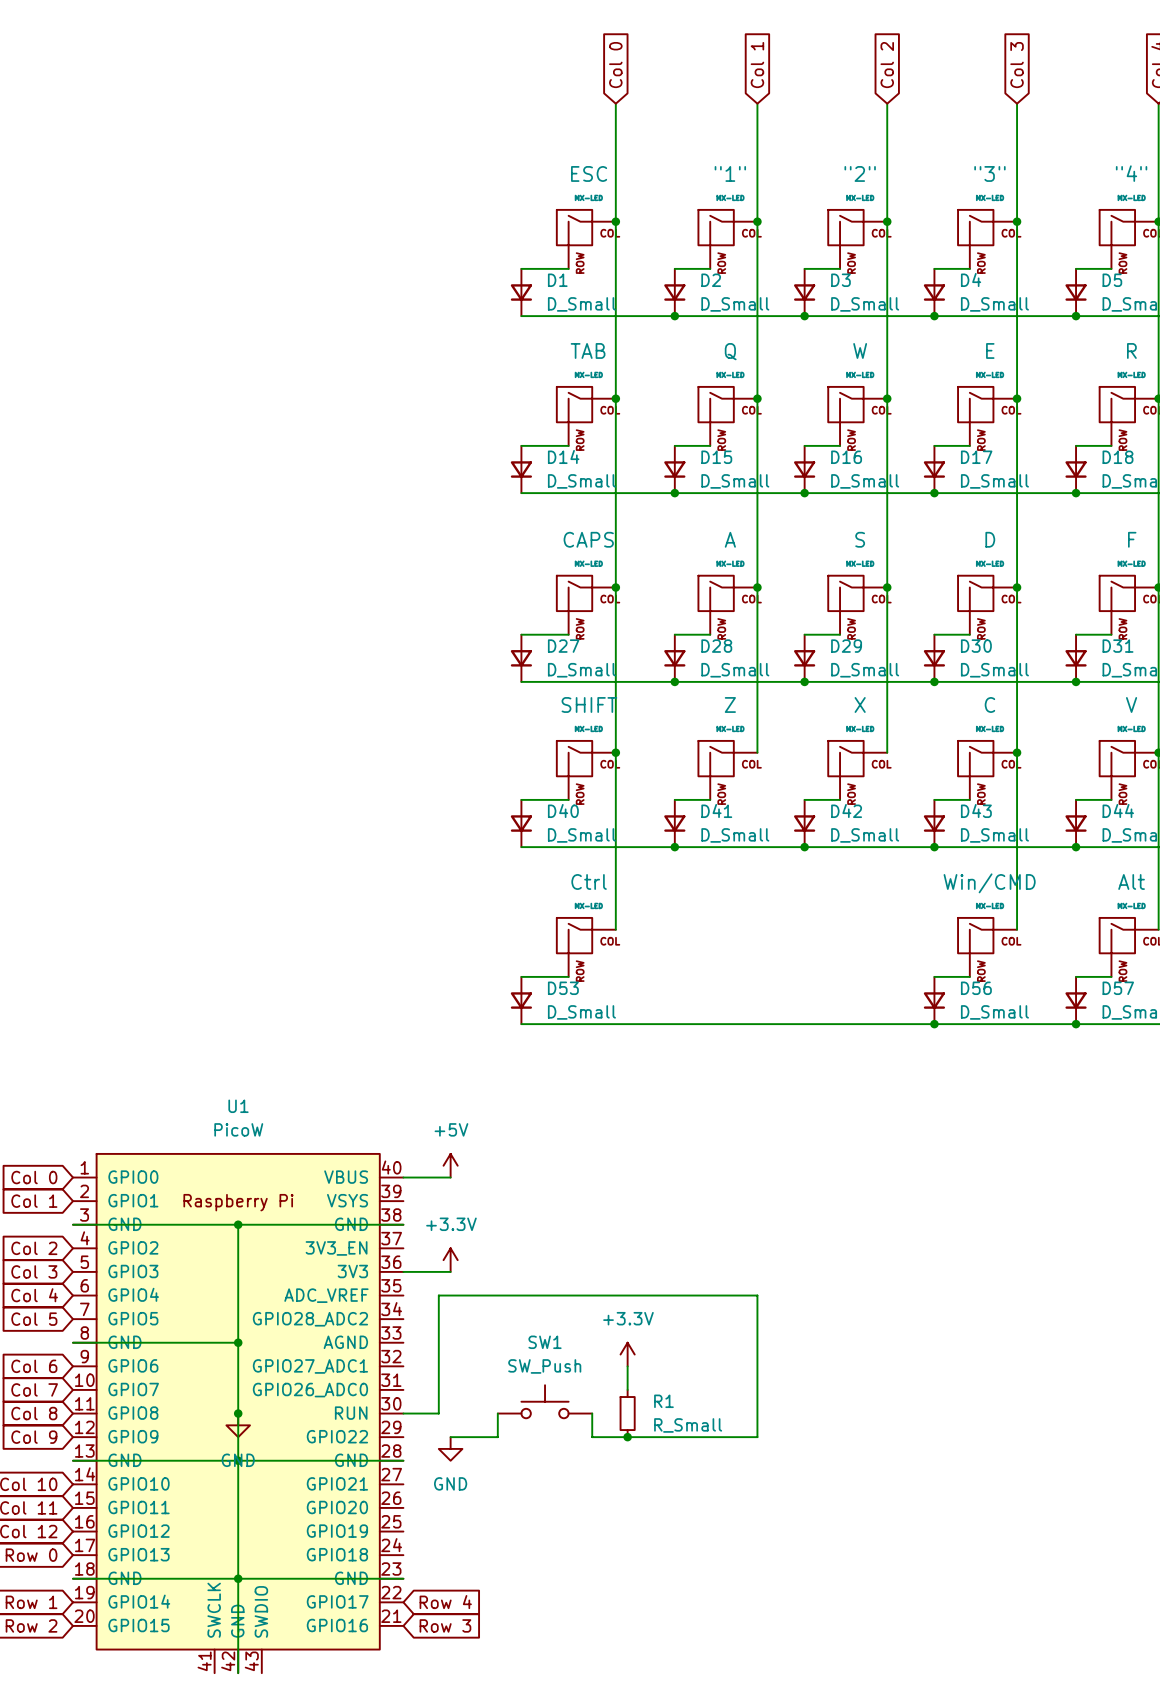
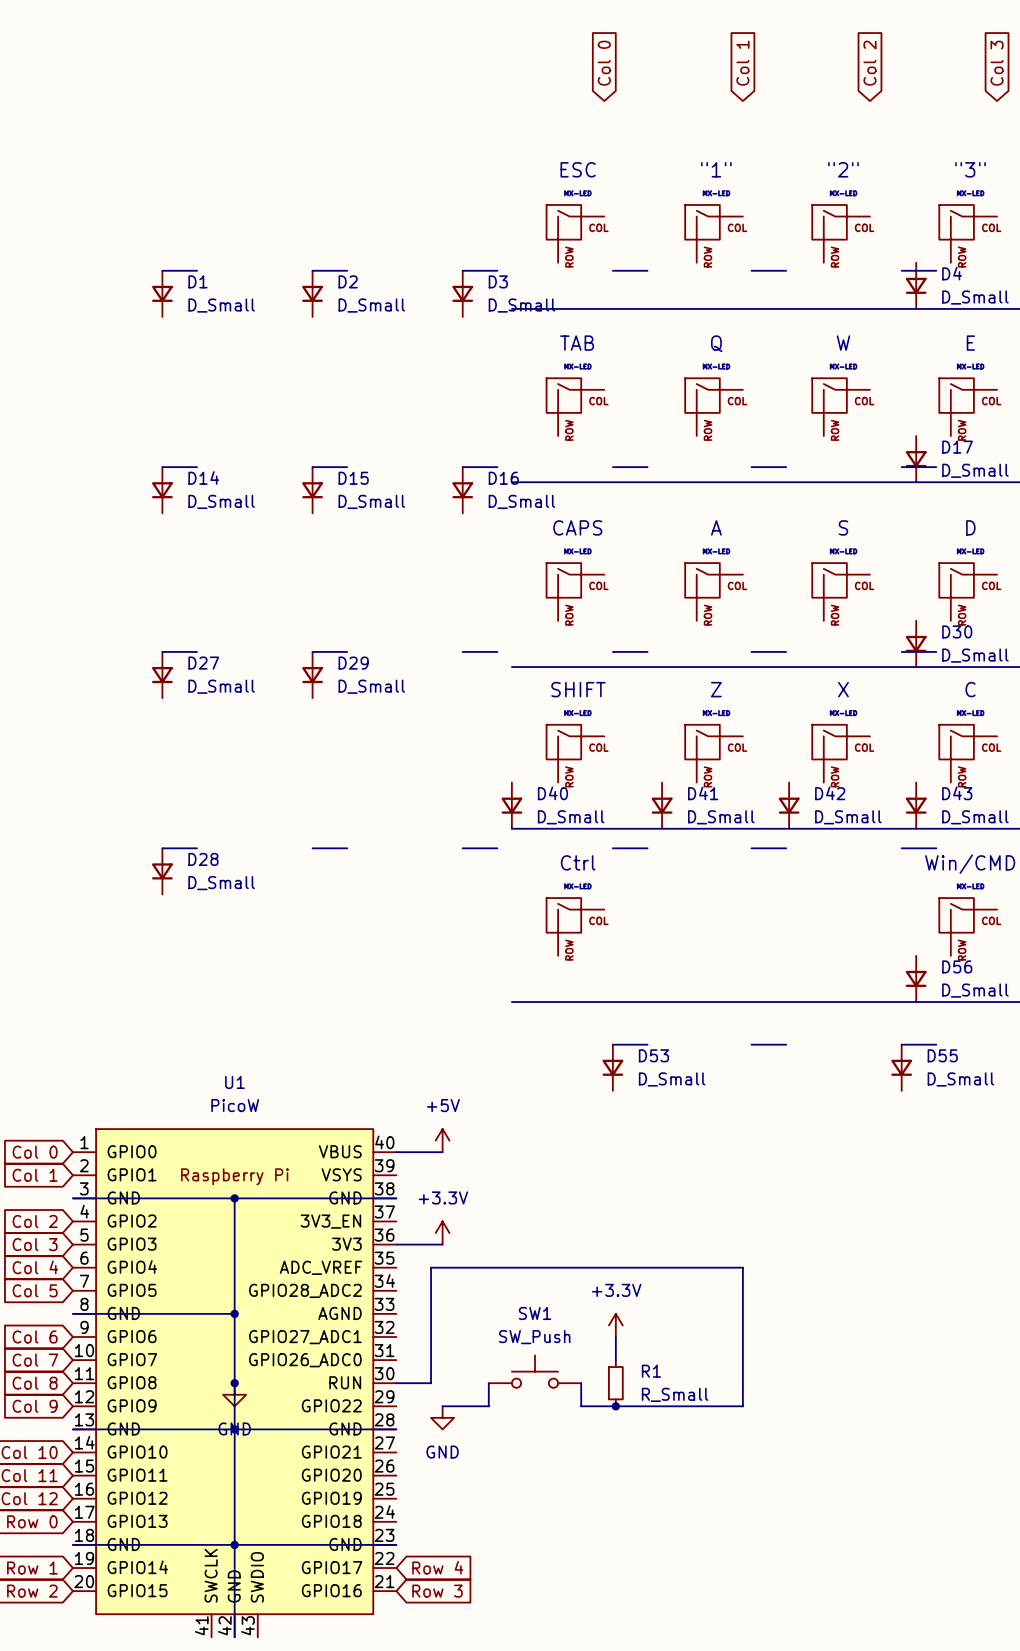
wire: (615, 103) (615, 929) -> none
wire: (757, 103) (757, 752) -> none
wire: (887, 103) (887, 752) -> none
wire: (1017, 103) (1017, 929) -> none
junction: (615, 221) -> none
junction: (757, 221) -> none
junction: (887, 221) -> none
junction: (1017, 221) -> none
wire: (521, 268) (568, 268) -> none
wire: (674, 268) (710, 268) -> (462, 270) (497, 270)
wire: (804, 268) (840, 268) -> (751, 270) (786, 270)
wire: (934, 268) (969, 268) -> (901, 270) (936, 270)
wire: none -> (162, 270) (197, 270)
wire: none -> (312, 270) (347, 270)
wire: none -> (612, 270) (647, 270)
D1 position: (521, 292) -> (162, 293)
D2 position: (674, 292) -> (312, 293)
D3 position: (804, 292) -> (462, 293)
junction: (674, 316) -> none
junction: (804, 316) -> none
junction: (934, 316) -> none
junction: (615, 398) -> none
junction: (757, 398) -> none
junction: (887, 398) -> none
junction: (1017, 398) -> none
wire: (521, 445) (568, 445) -> none
wire: (674, 445) (710, 445) -> (462, 467) (497, 467)
wire: (804, 445) (840, 445) -> (751, 467) (786, 467)
wire: (934, 445) (969, 445) -> (901, 467) (936, 467)
D14 position: (521, 469) -> (162, 490)
D15 position: (674, 469) -> (312, 490)
D16 position: (804, 469) -> (462, 490)
wire: none -> (162, 467) (197, 467)
wire: none -> (312, 467) (347, 467)
wire: none -> (612, 467) (647, 467)
junction: (674, 493) -> none
junction: (804, 493) -> none
junction: (934, 493) -> none
junction: (615, 587) -> none
junction: (757, 587) -> none
junction: (887, 587) -> none
junction: (1017, 587) -> none
wire: (521, 634) (568, 634) -> none
wire: (674, 634) (710, 634) -> (462, 651) (497, 651)
wire: (804, 634) (840, 634) -> (751, 651) (786, 651)
wire: (934, 634) (969, 634) -> (901, 651) (936, 651)
D27 position: (521, 658) -> (162, 675)
D28 position: (674, 658) -> (162, 871)
D29 position: (804, 658) -> (312, 675)
wire: none -> (162, 651) (197, 651)
wire: none -> (312, 651) (347, 651)
wire: none -> (612, 651) (647, 651)
junction: (674, 681) -> none
junction: (804, 681) -> none
junction: (934, 681) -> none
junction: (615, 752) -> none
junction: (1017, 752) -> none
wire: (521, 799) (568, 799) -> none
wire: (674, 799) (710, 799) -> (462, 848) (497, 848)
wire: (804, 799) (840, 799) -> (751, 848) (786, 848)
wire: (934, 799) (969, 799) -> (901, 848) (936, 848)
junction: (674, 847) -> none
junction: (804, 847) -> none
junction: (934, 847) -> none
wire: none -> (162, 848) (197, 848)
wire: none -> (312, 848) (347, 848)
wire: none -> (612, 848) (647, 848)
wire: (521, 976) (568, 976) -> none
wire: (934, 976) (969, 976) -> (901, 1044) (936, 1044)
D53 position: (521, 1000) -> (612, 1067)
junction: (934, 1024) -> none
wire: none -> (612, 1044) (647, 1044)
wire: none -> (751, 1044) (786, 1044)
D55: none -> D_Small (901, 1067)

